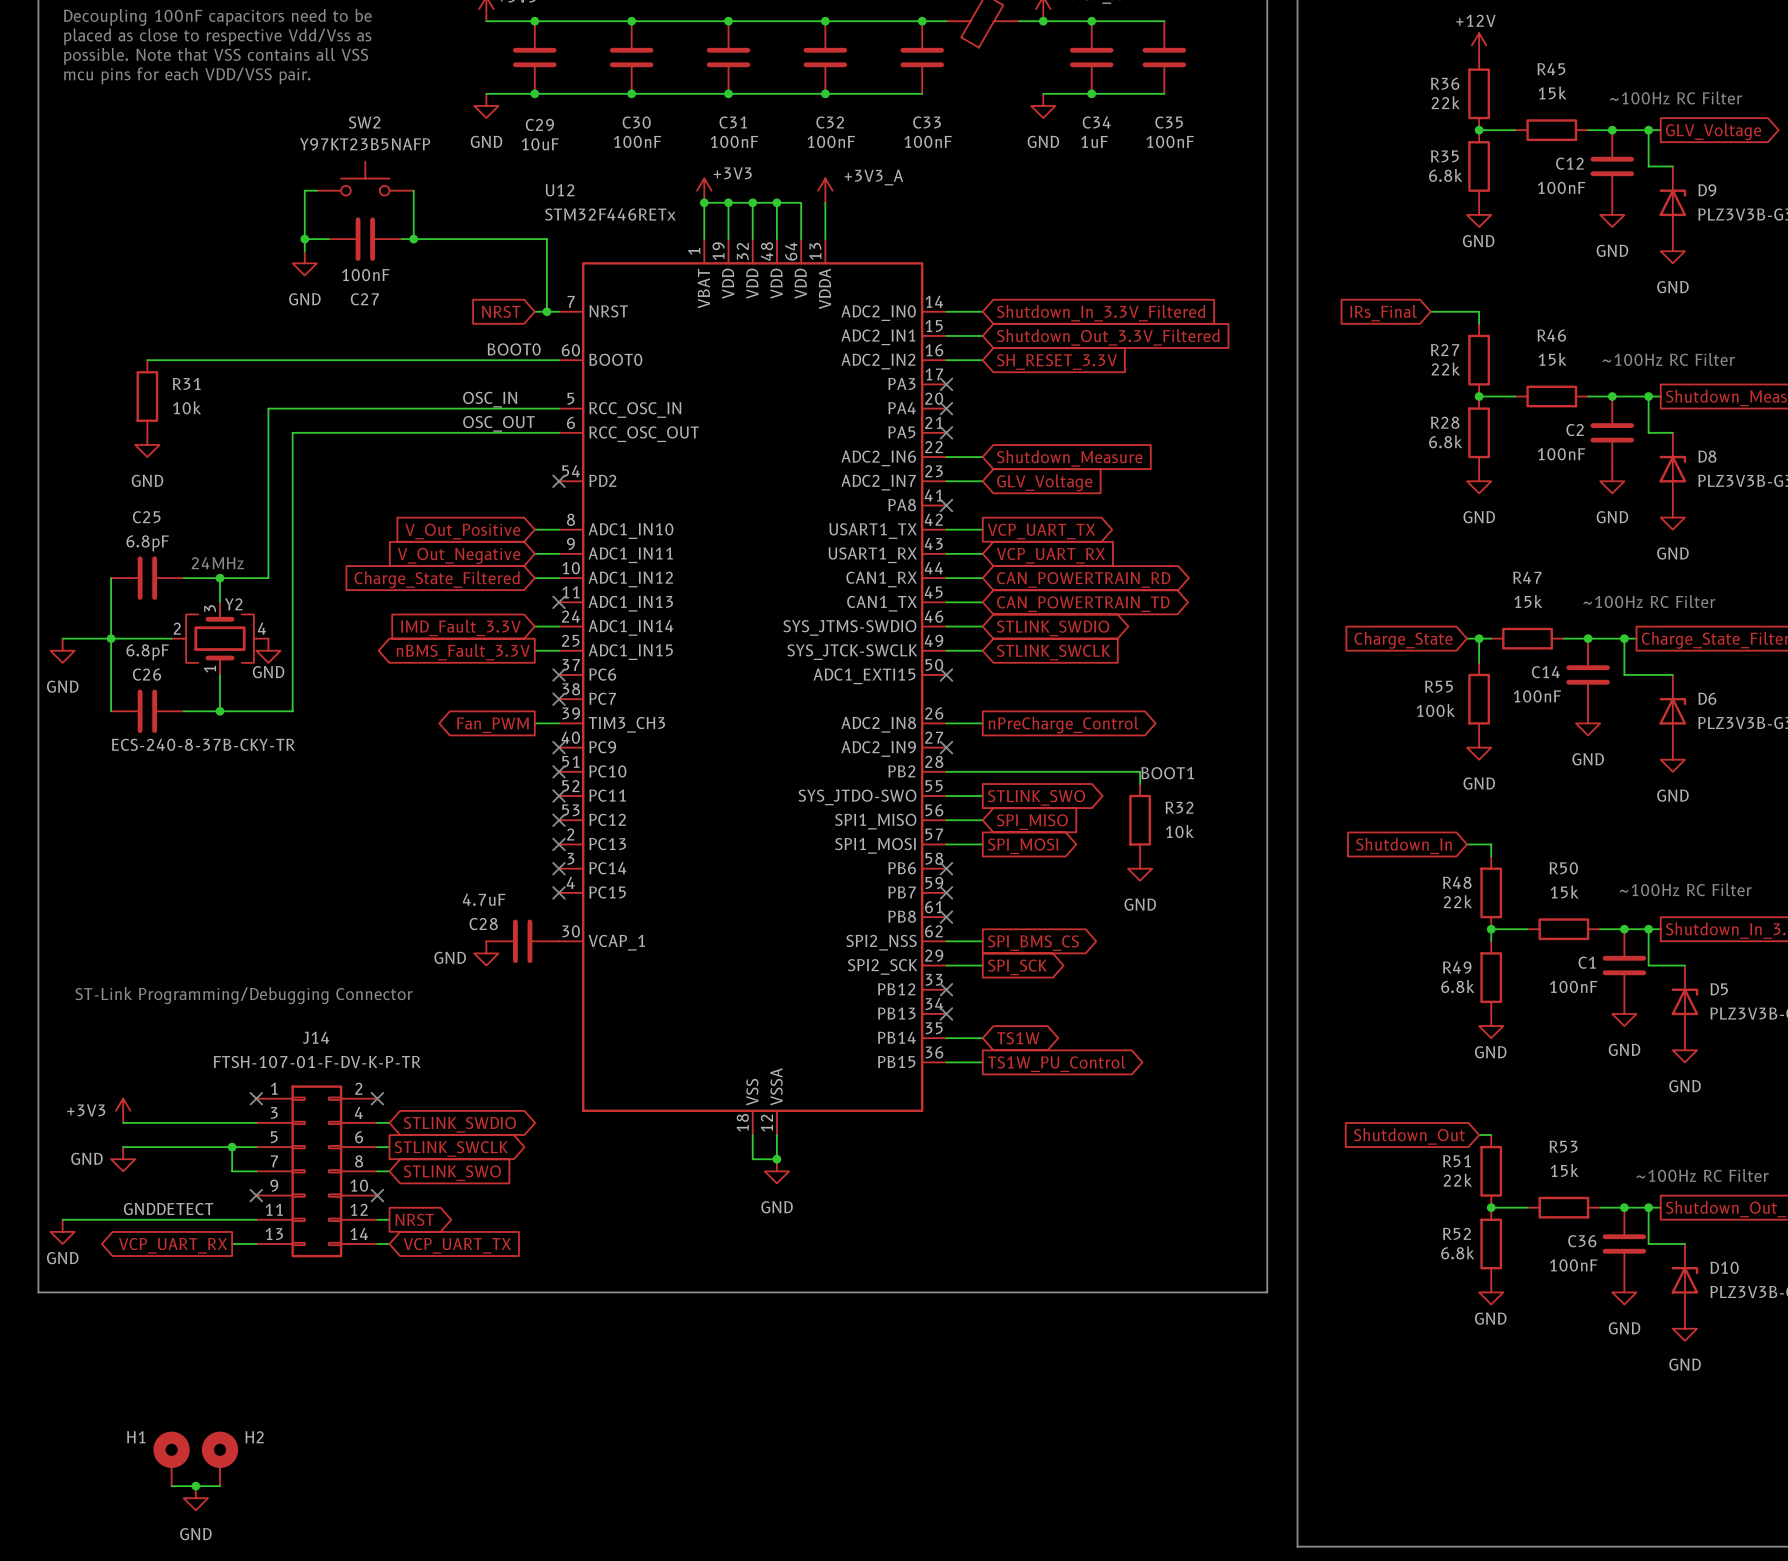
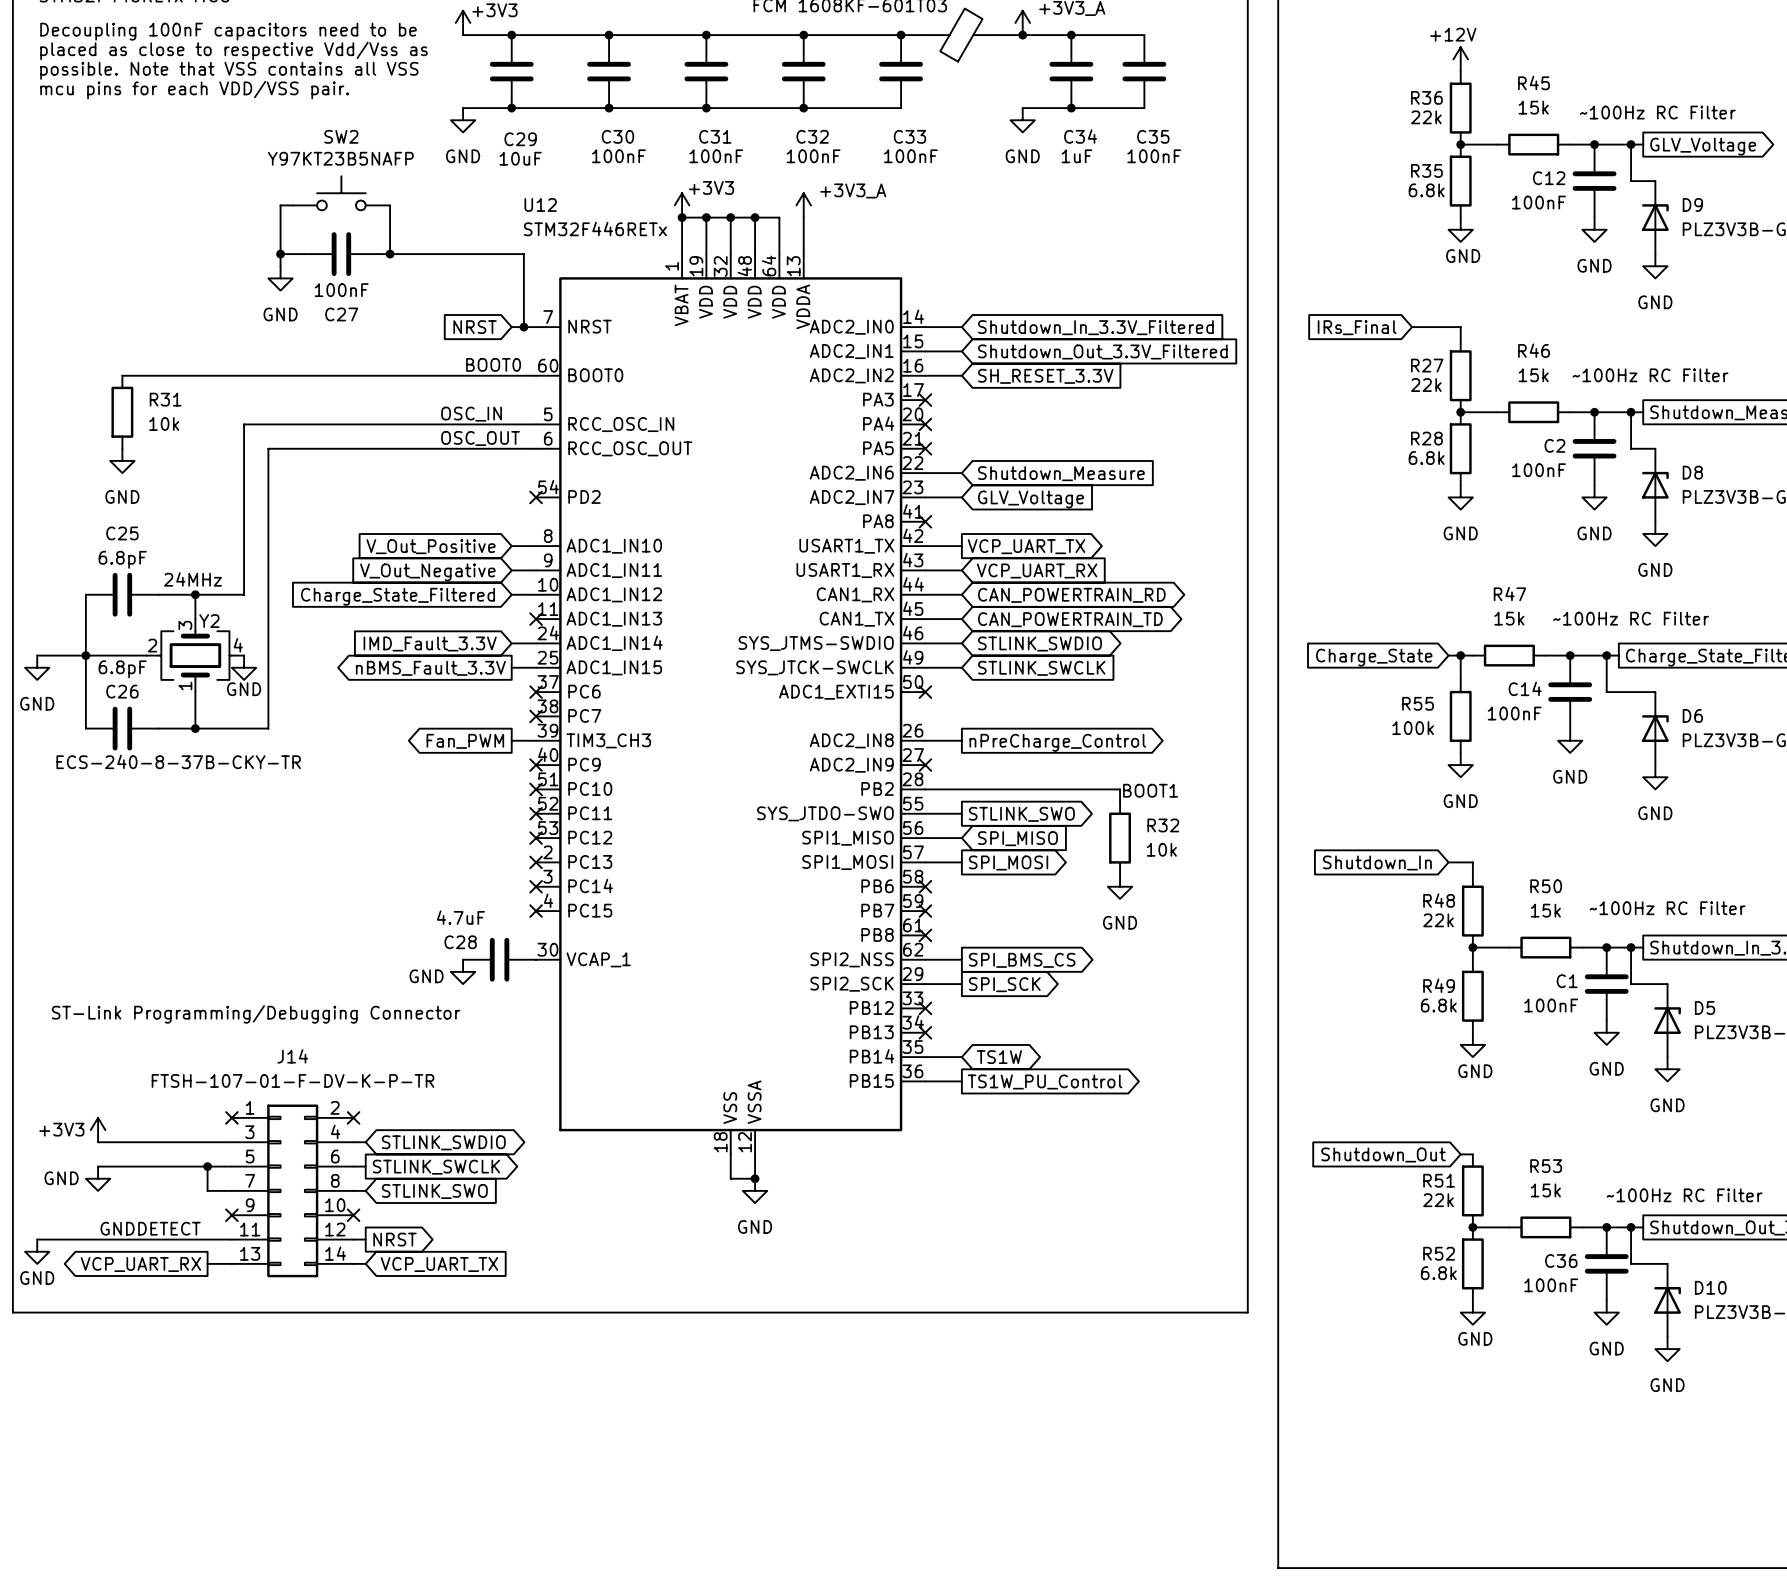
H1: (171, 1458) -> none
H2: (220, 1458) -> none
wire: (171, 1486) (220, 1486) -> none
junction: (195, 1486) -> none
power symbol: GND (195, 1498) -> none

